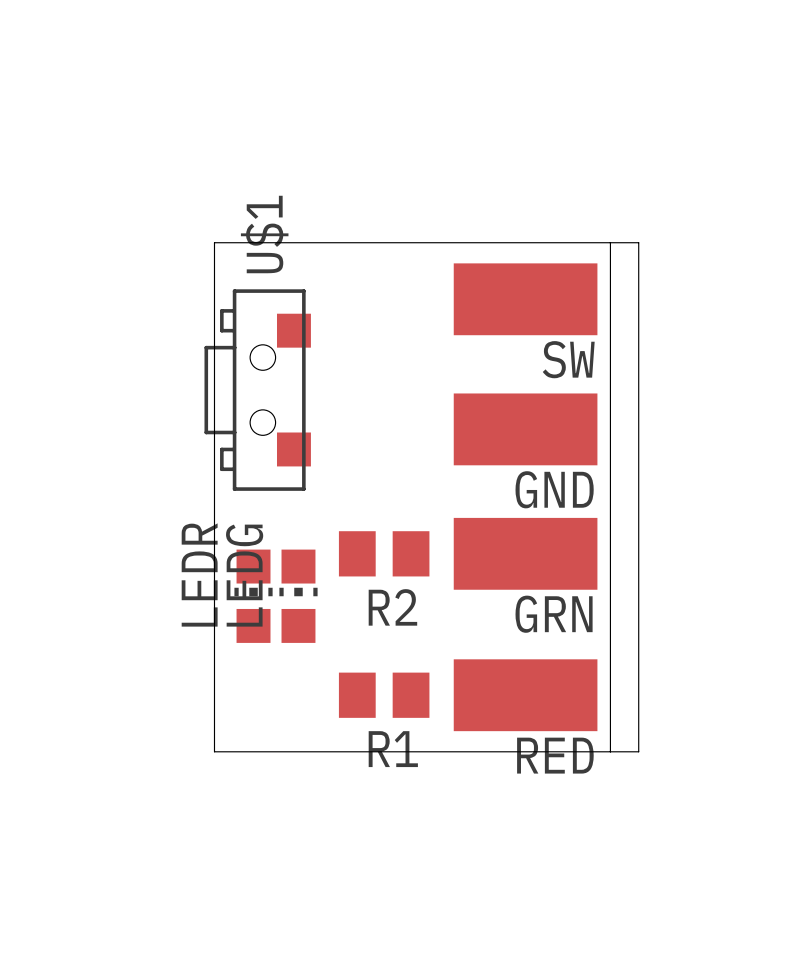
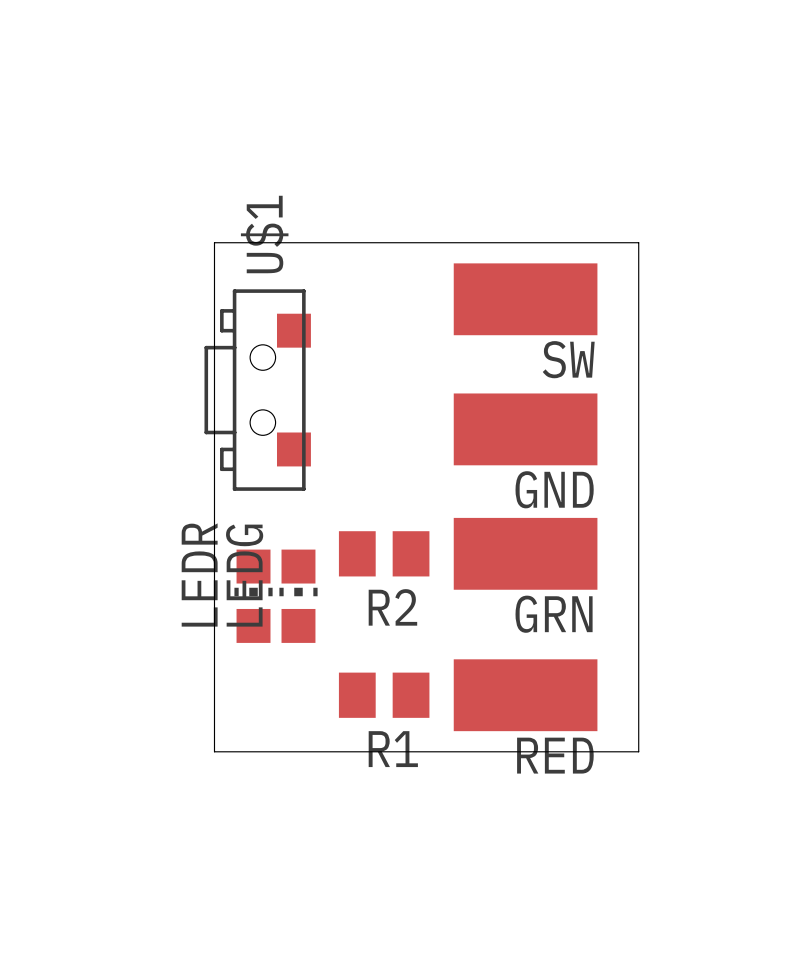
board edge: (610, 242) (610, 751) -> none

